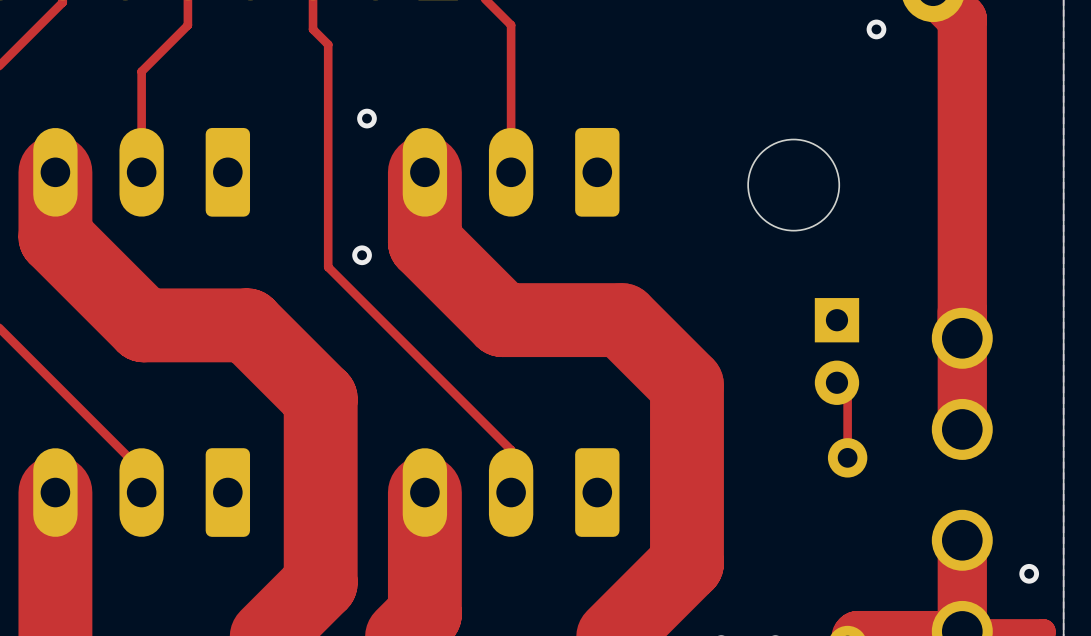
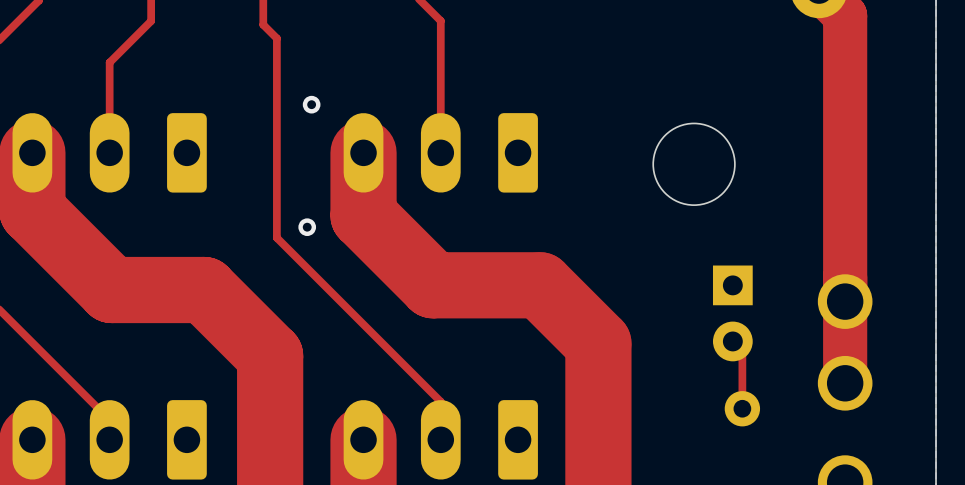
via: (876, 29) -> none

